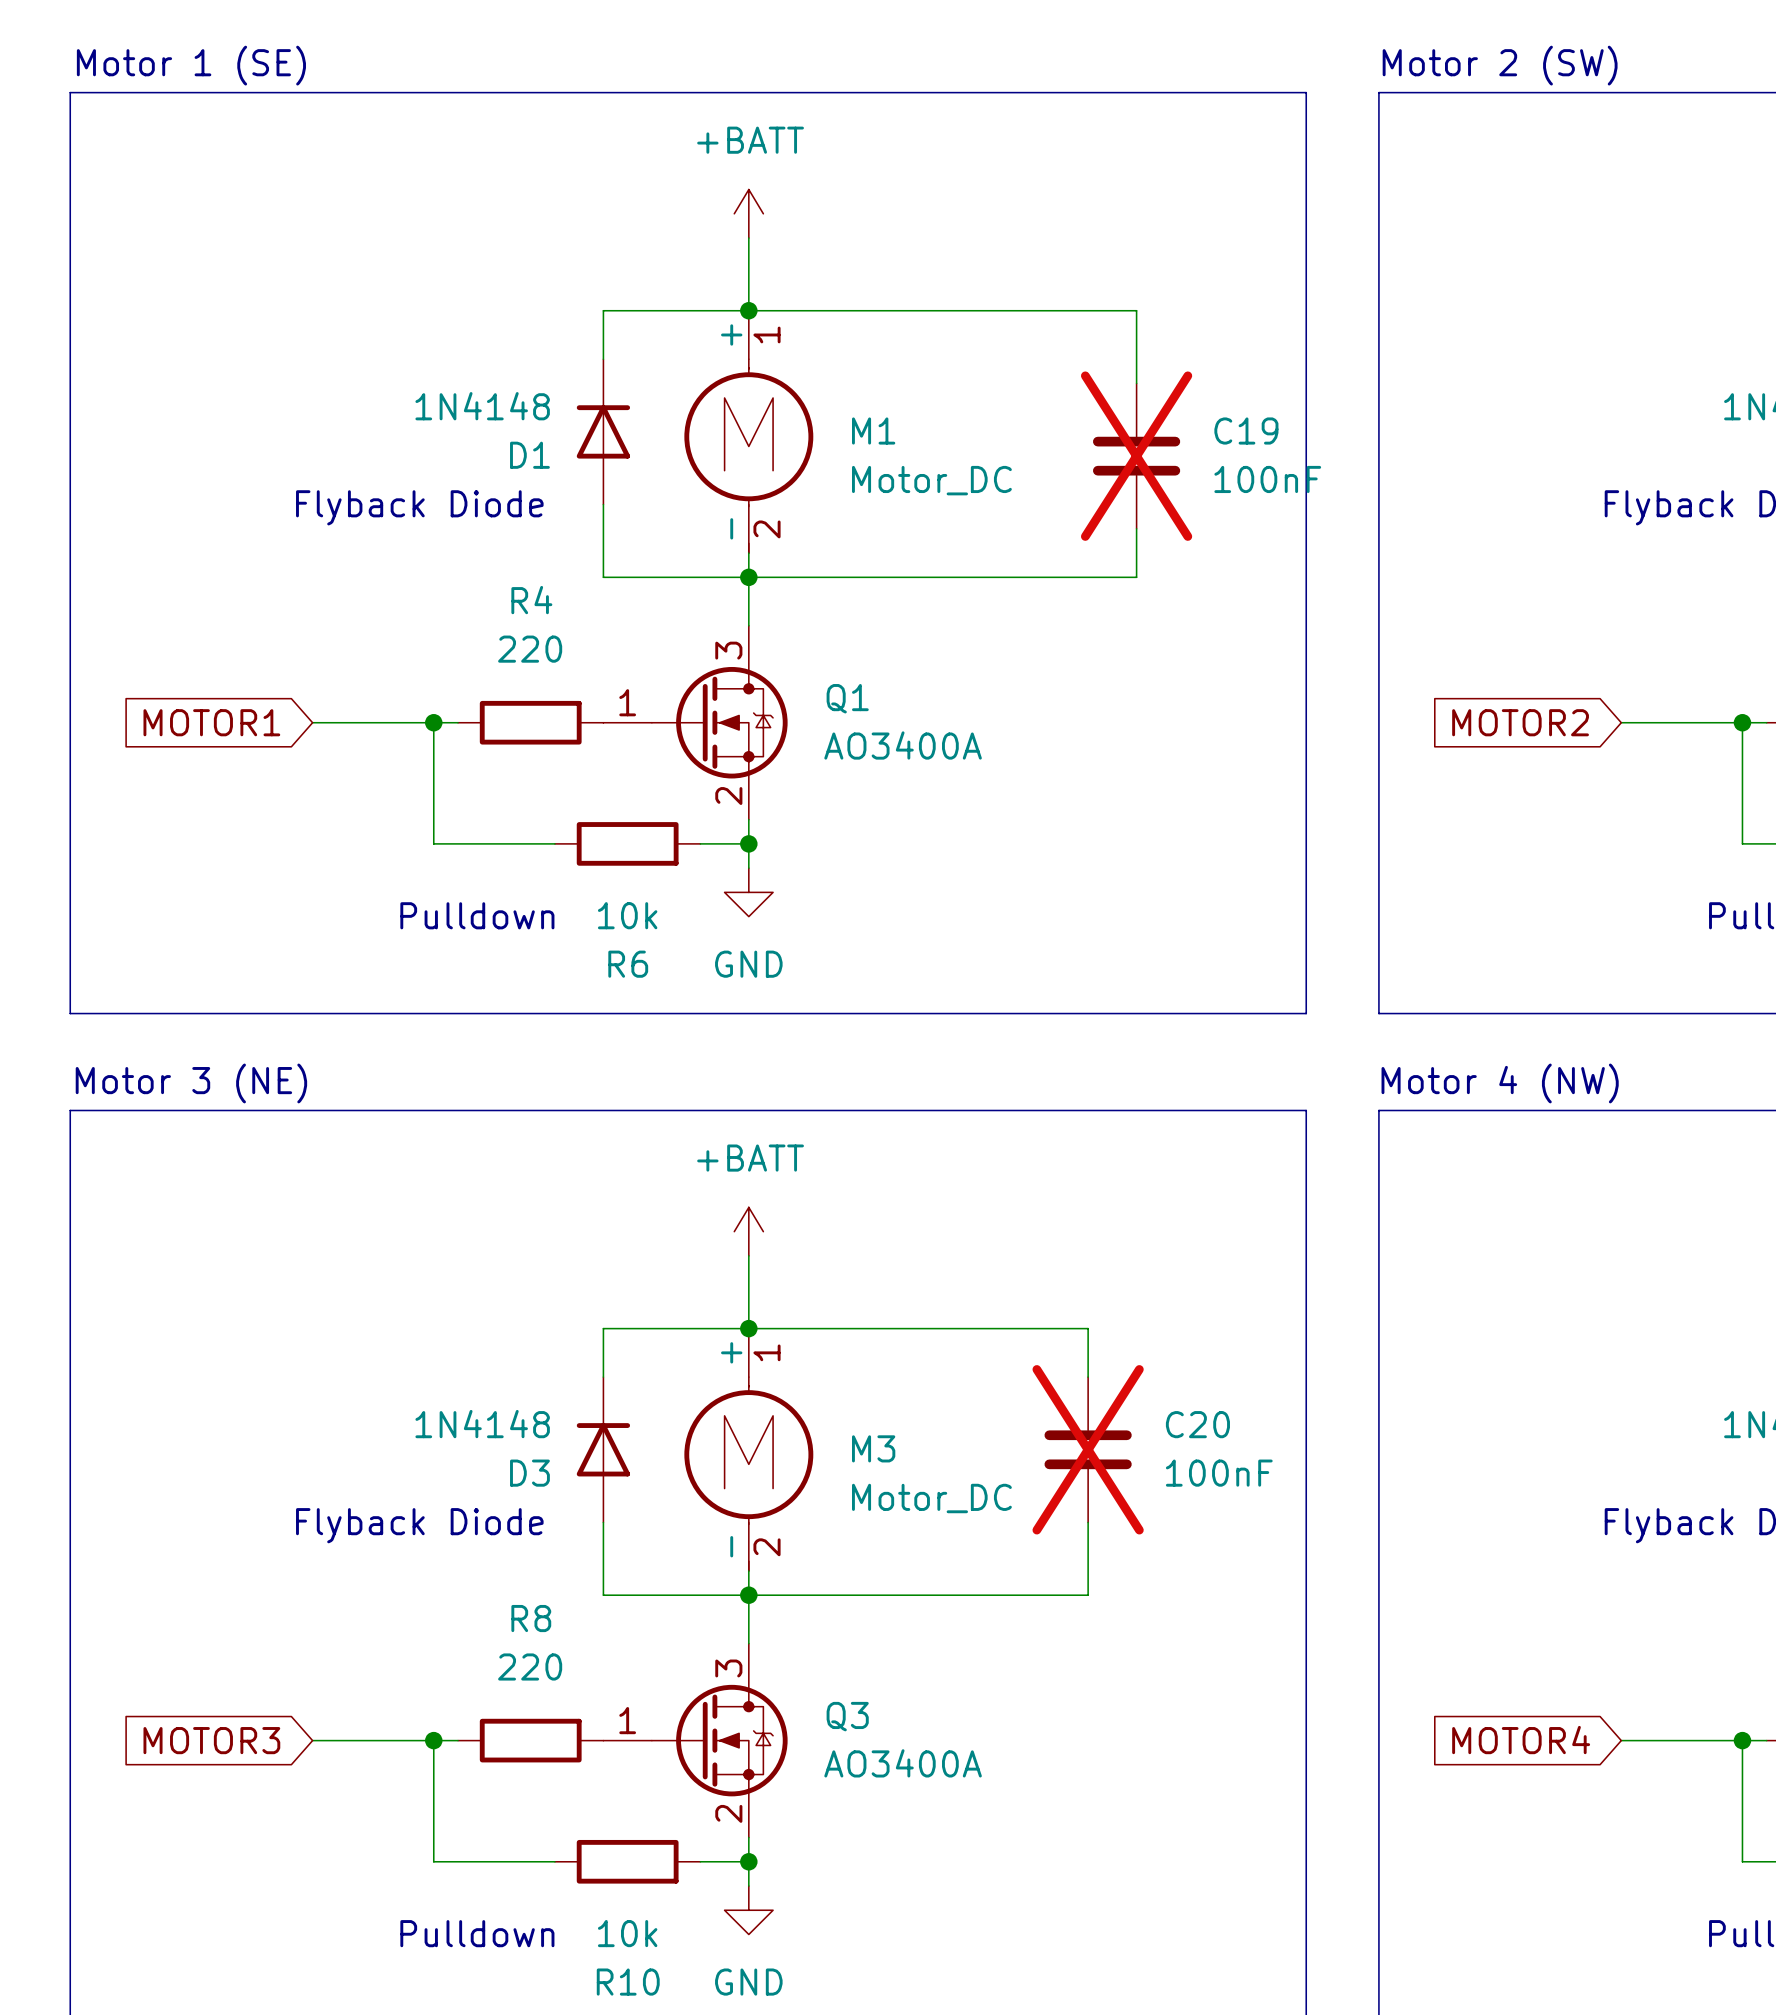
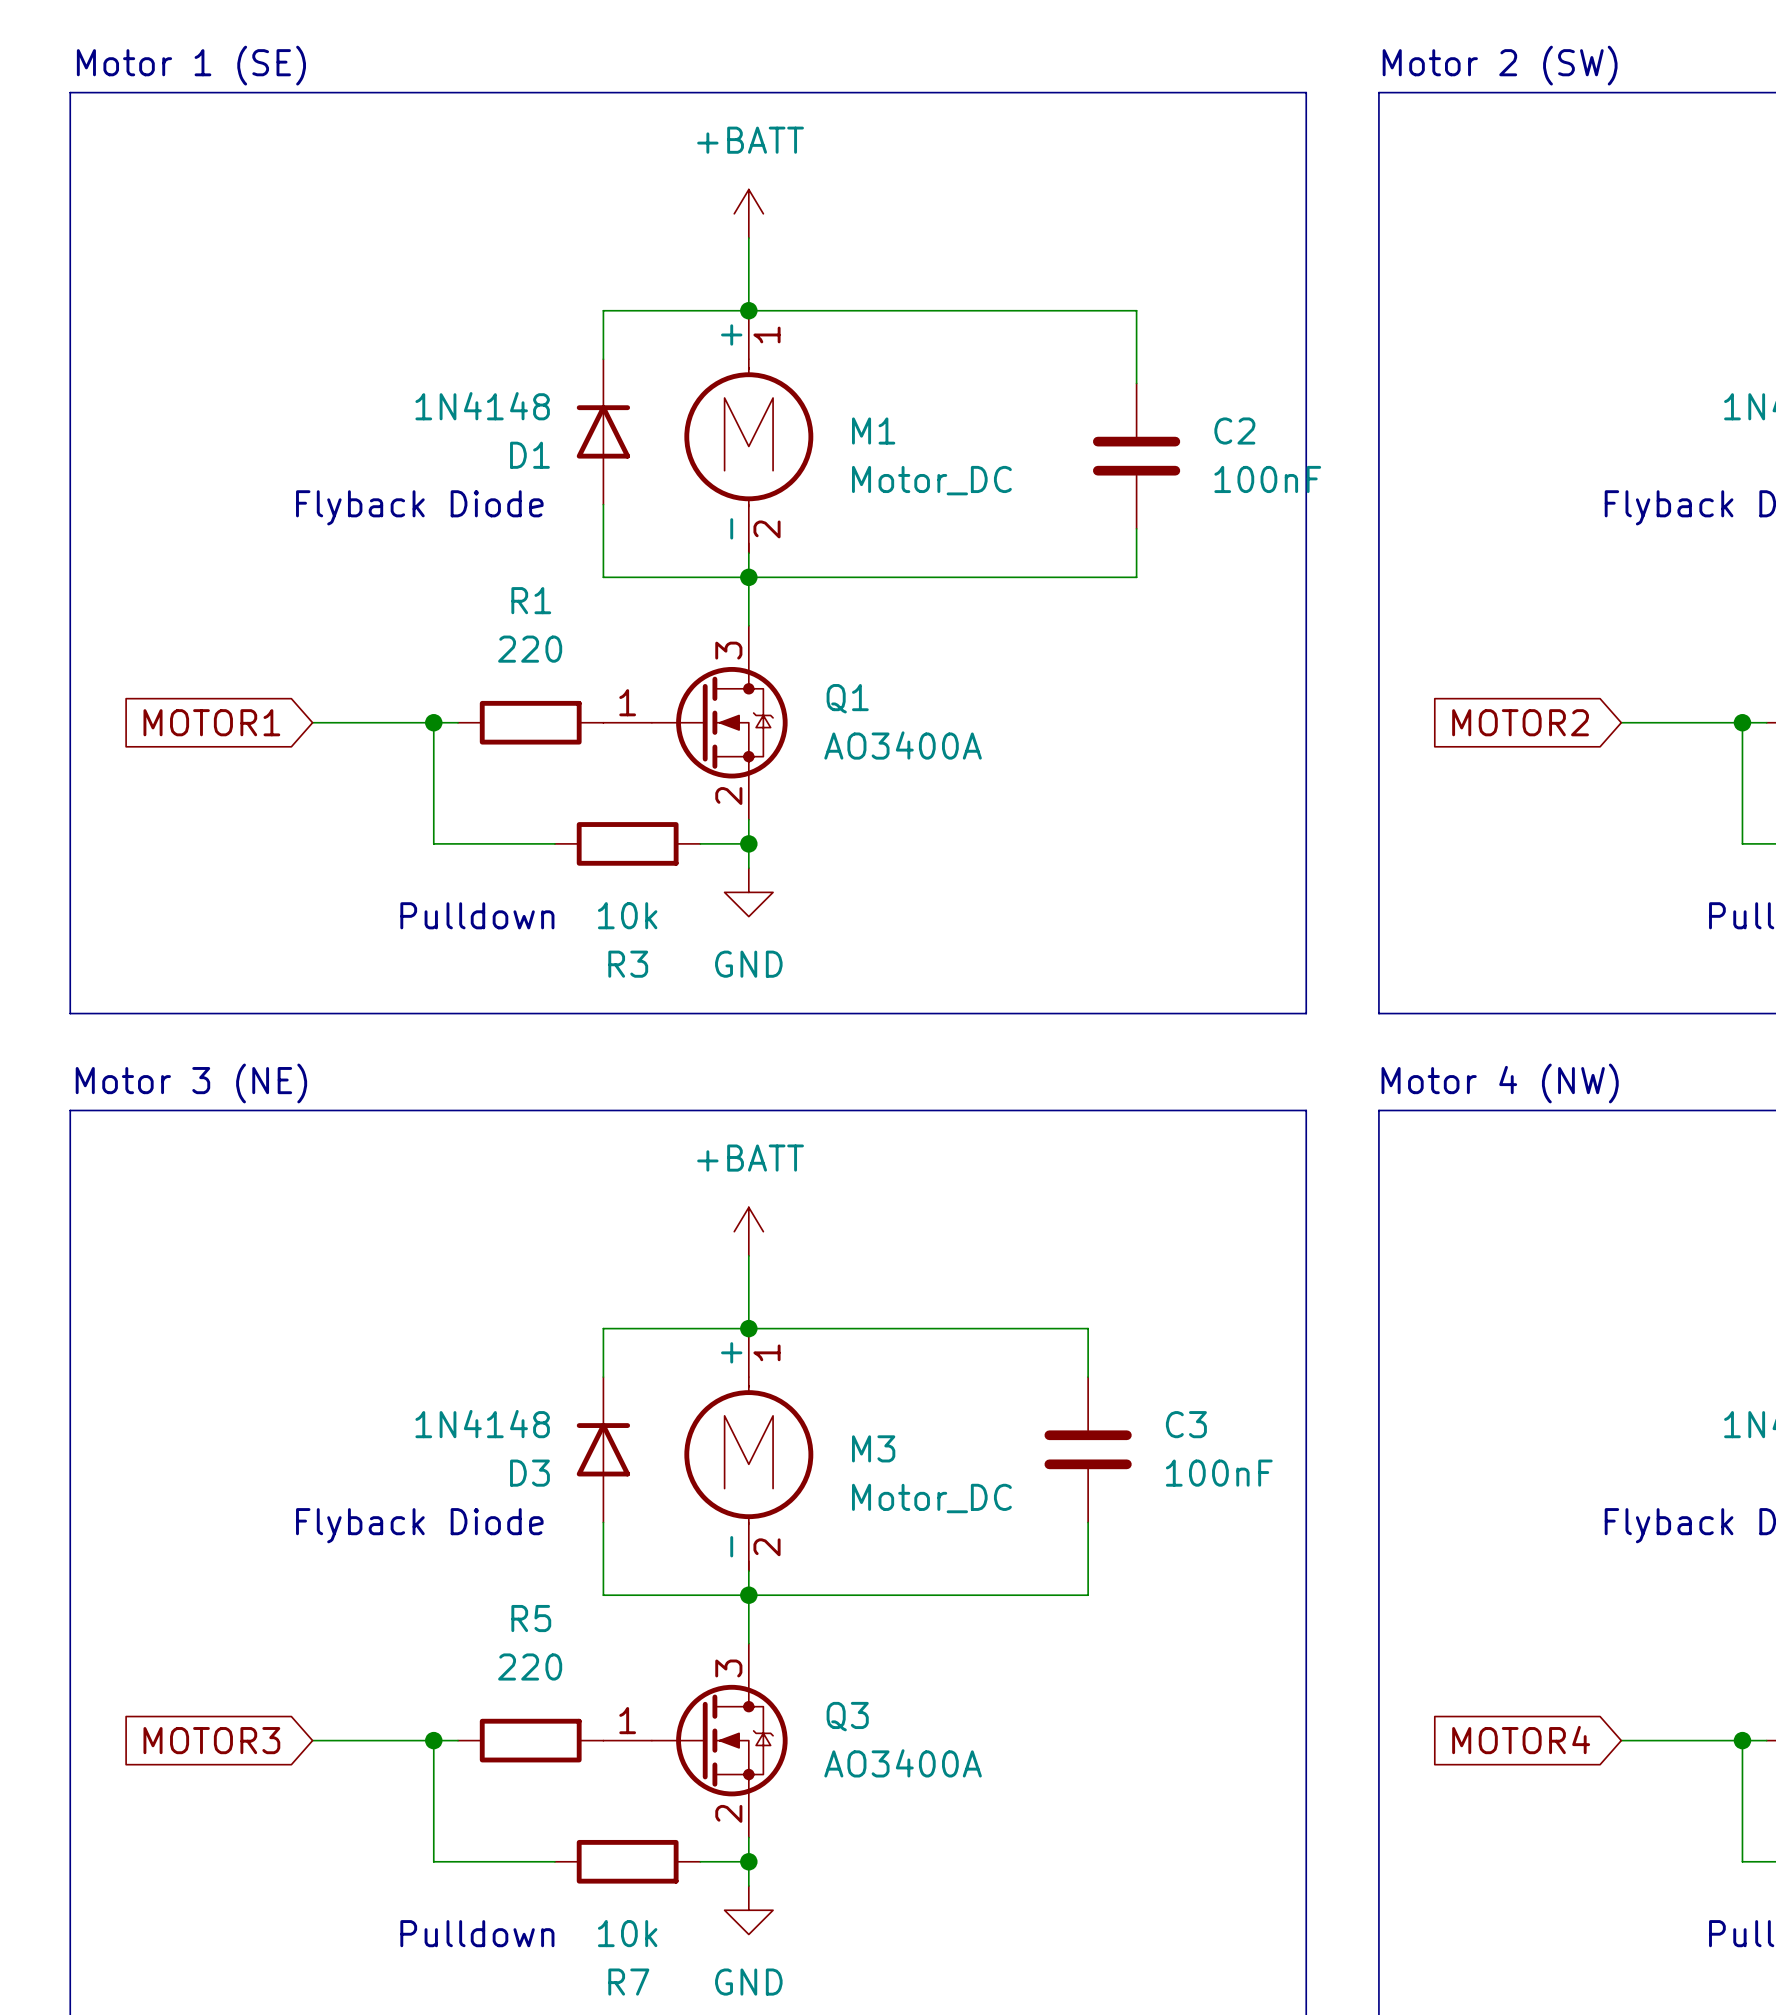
C19 name: C19 (1246, 431) -> C2 (1234, 431)
C19 do-not-place cross: (1136, 456) -> none
R4 name: R4 (531, 600) -> R1 (531, 600)
R6 name: R6 (628, 964) -> R3 (628, 964)
C20 name: C20 (1197, 1424) -> C3 (1186, 1424)
C20 do-not-place cross: (1088, 1449) -> none
R8 name: R8 (531, 1618) -> R5 (531, 1618)
R10 name: R10 (628, 1982) -> R7 (628, 1982)

